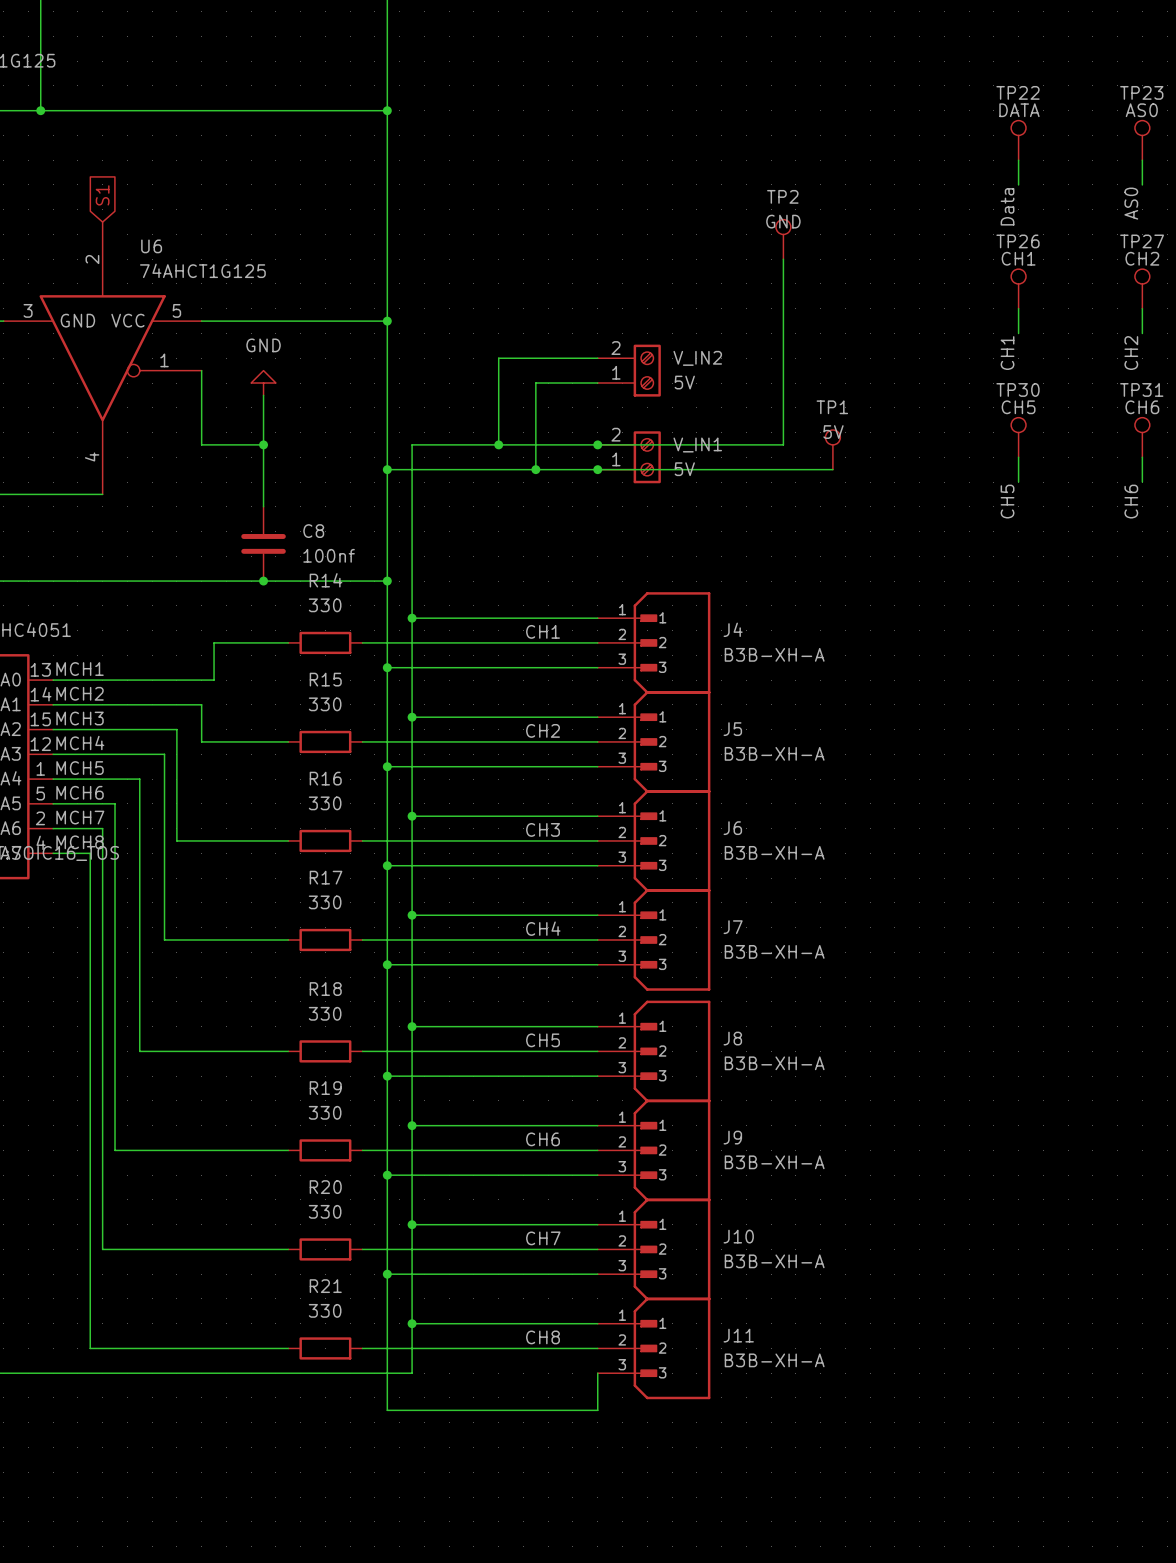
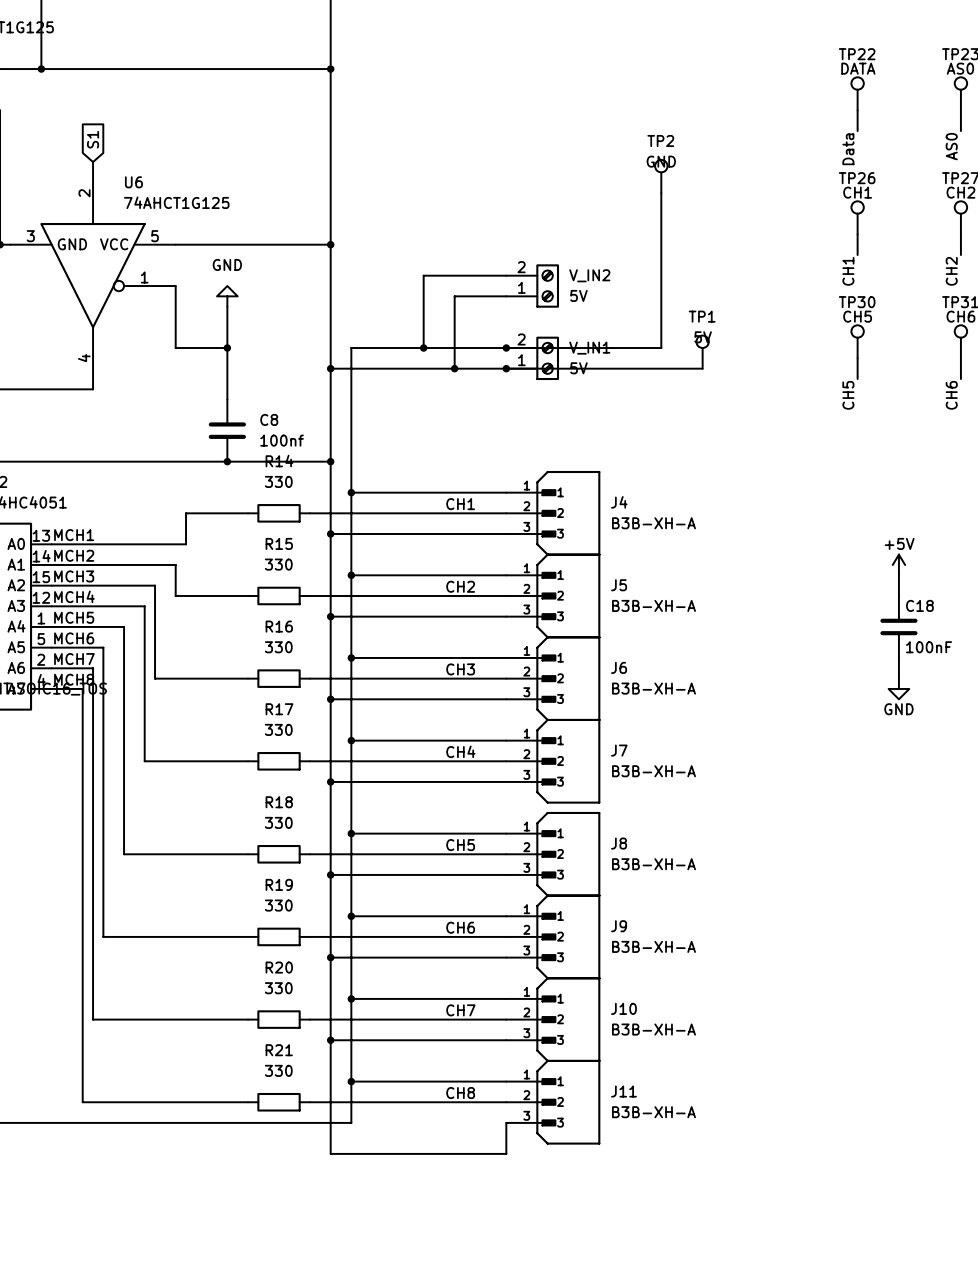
power symbol: none -> +5V (898, 564)
wire: none -> (898, 575) (898, 595)
C18: none -> 100nF (898, 626)
wire: none -> (898, 657) (898, 678)
power symbol: none -> GND (898, 688)

